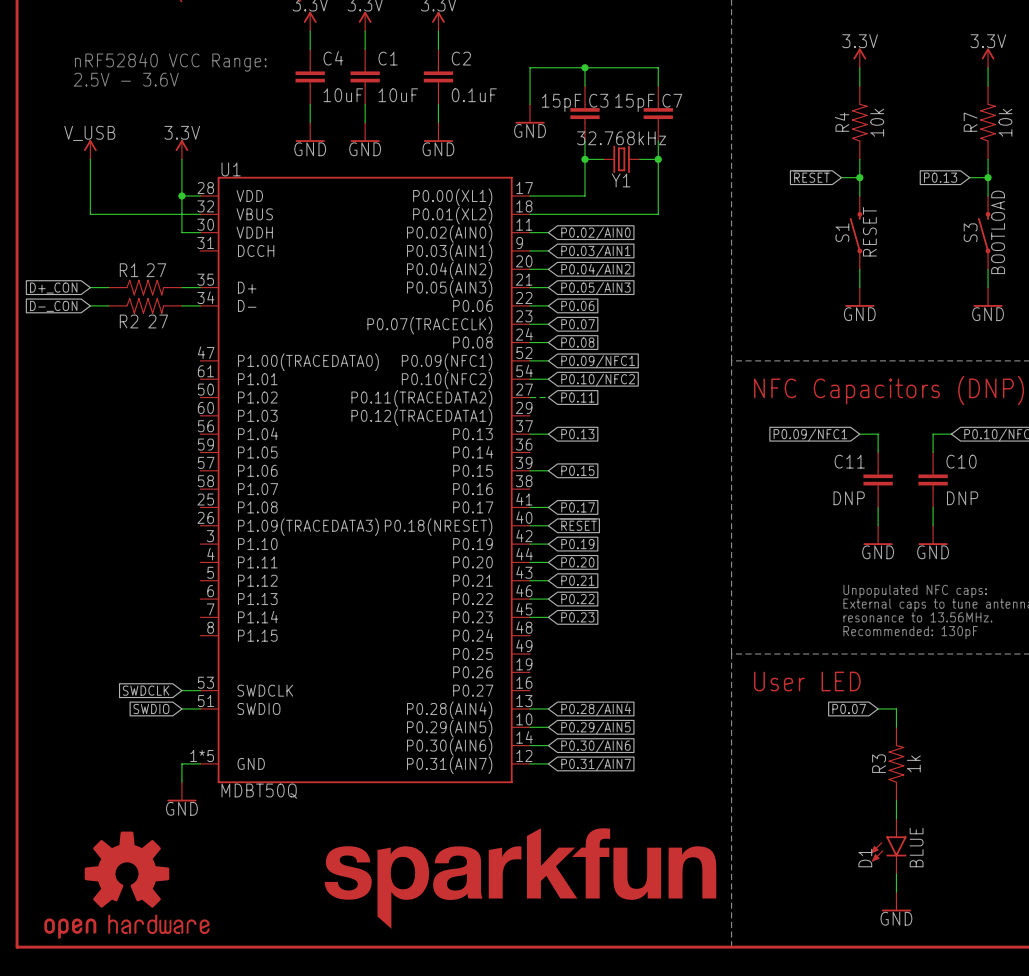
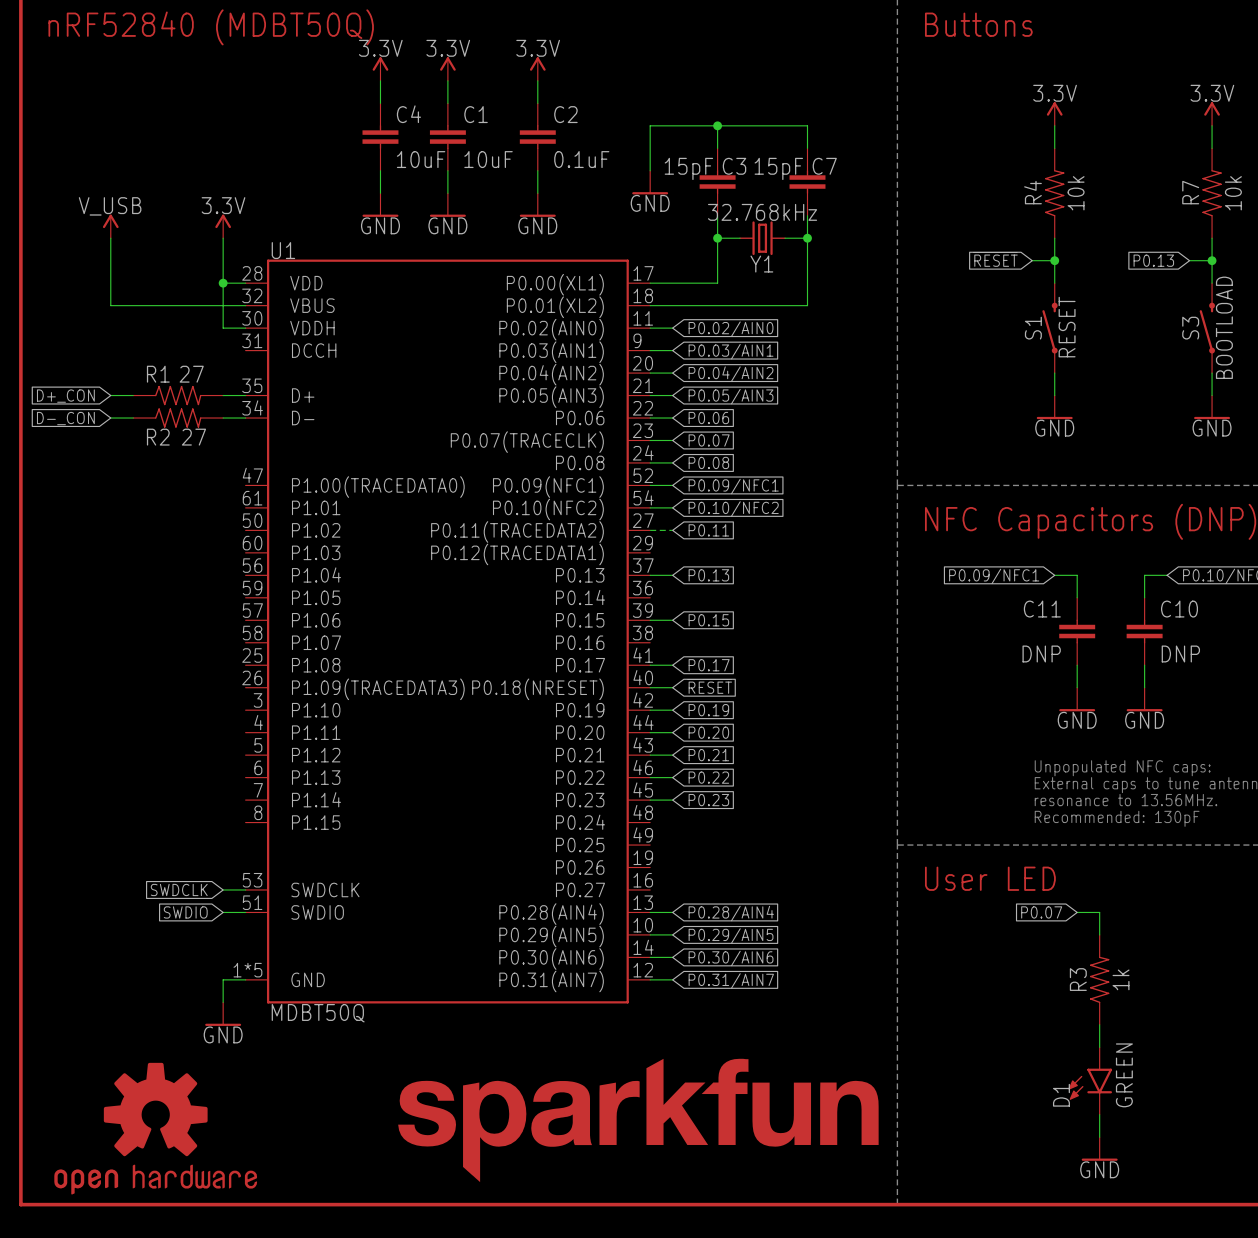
text: nRF52840 VCC Range: (170, 62) -> none
text: 2.5V - 3.6V (126, 79) -> none
D1 value: BLUE (916, 847) -> GREEN (1124, 1075)

